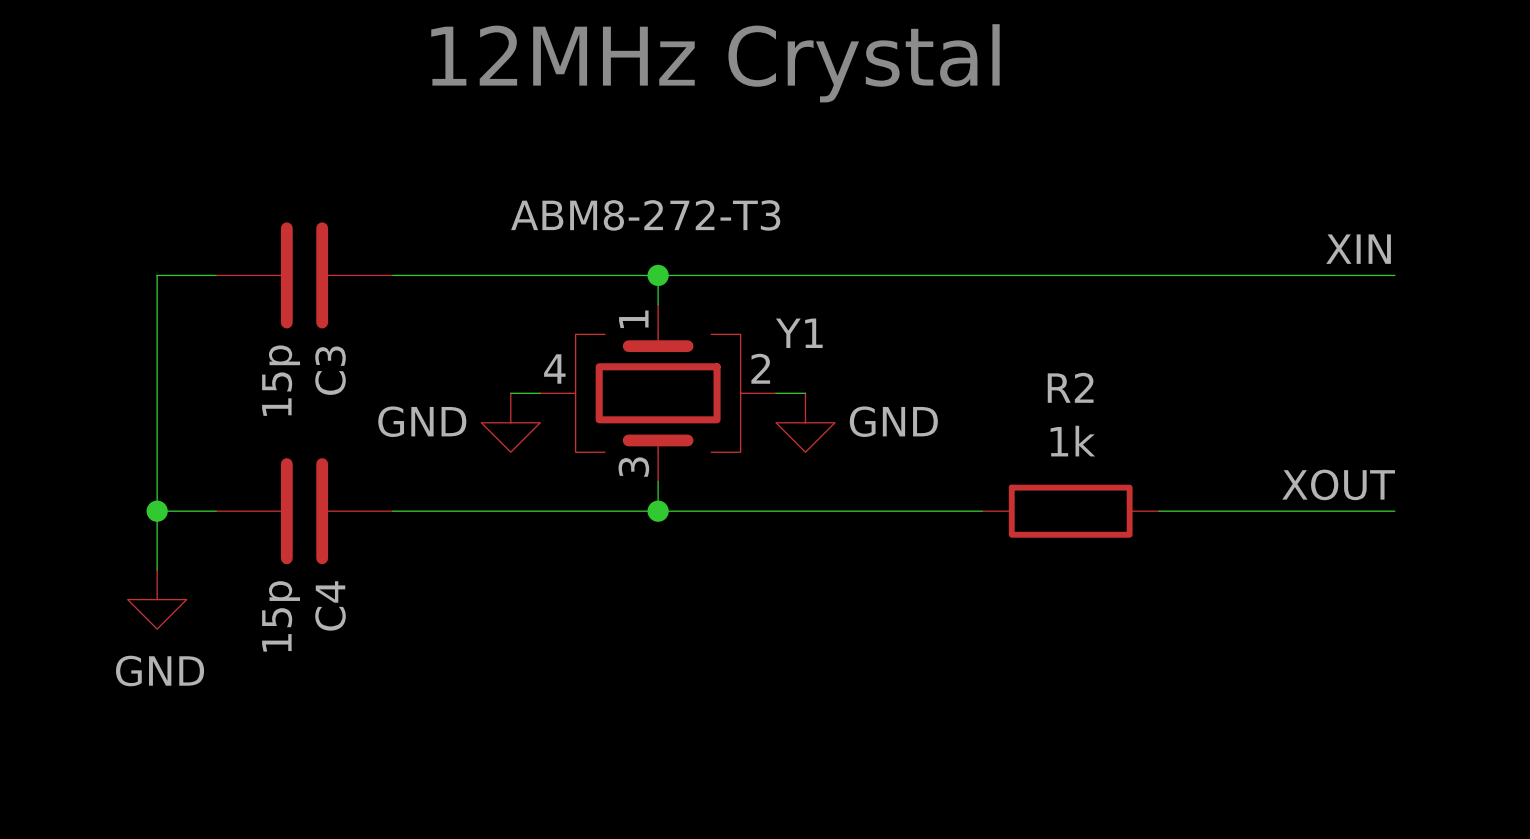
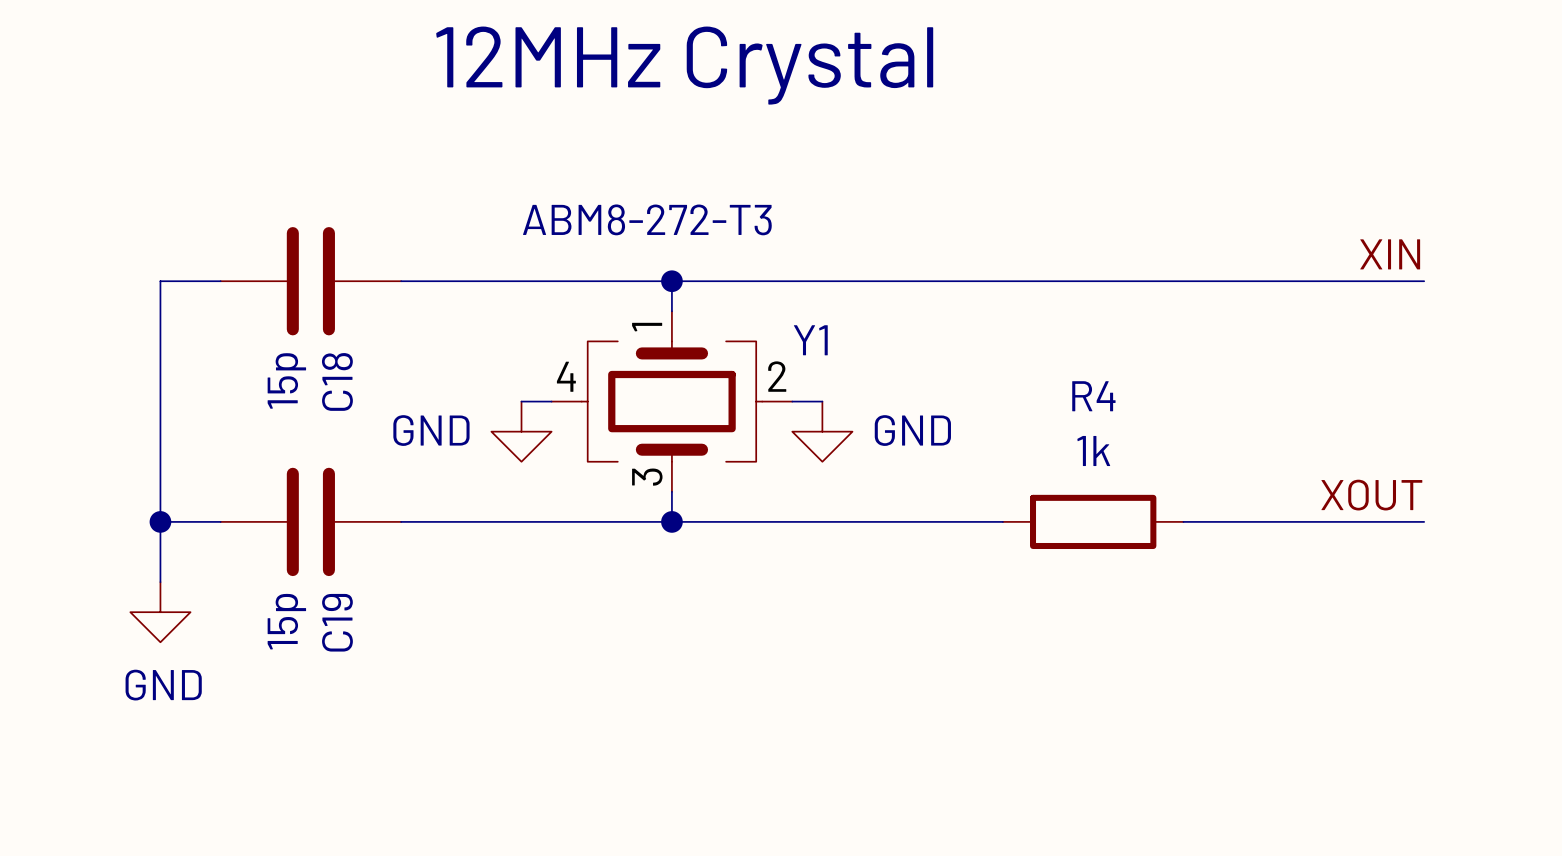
C3 name: C3 (330, 370) -> C18 (337, 381)
R2 name: R2 (1070, 387) -> R4 (1093, 396)
C4 name: C4 (330, 605) -> C19 (337, 622)

